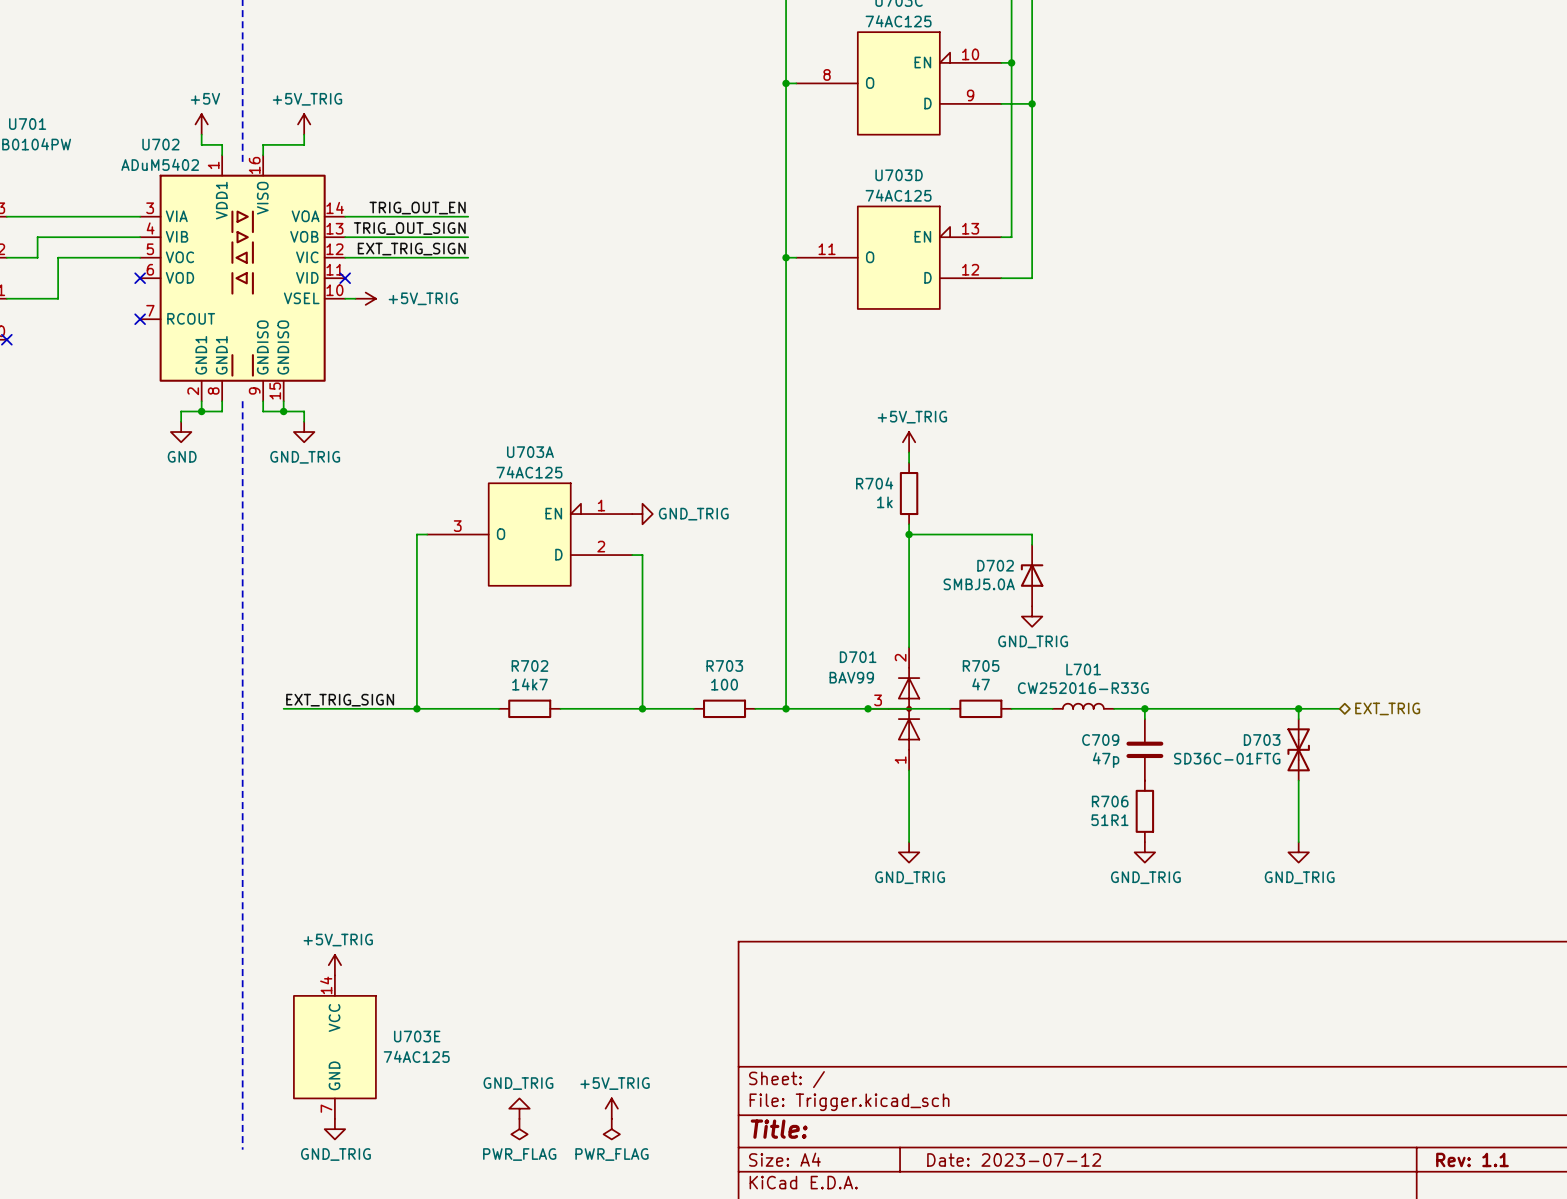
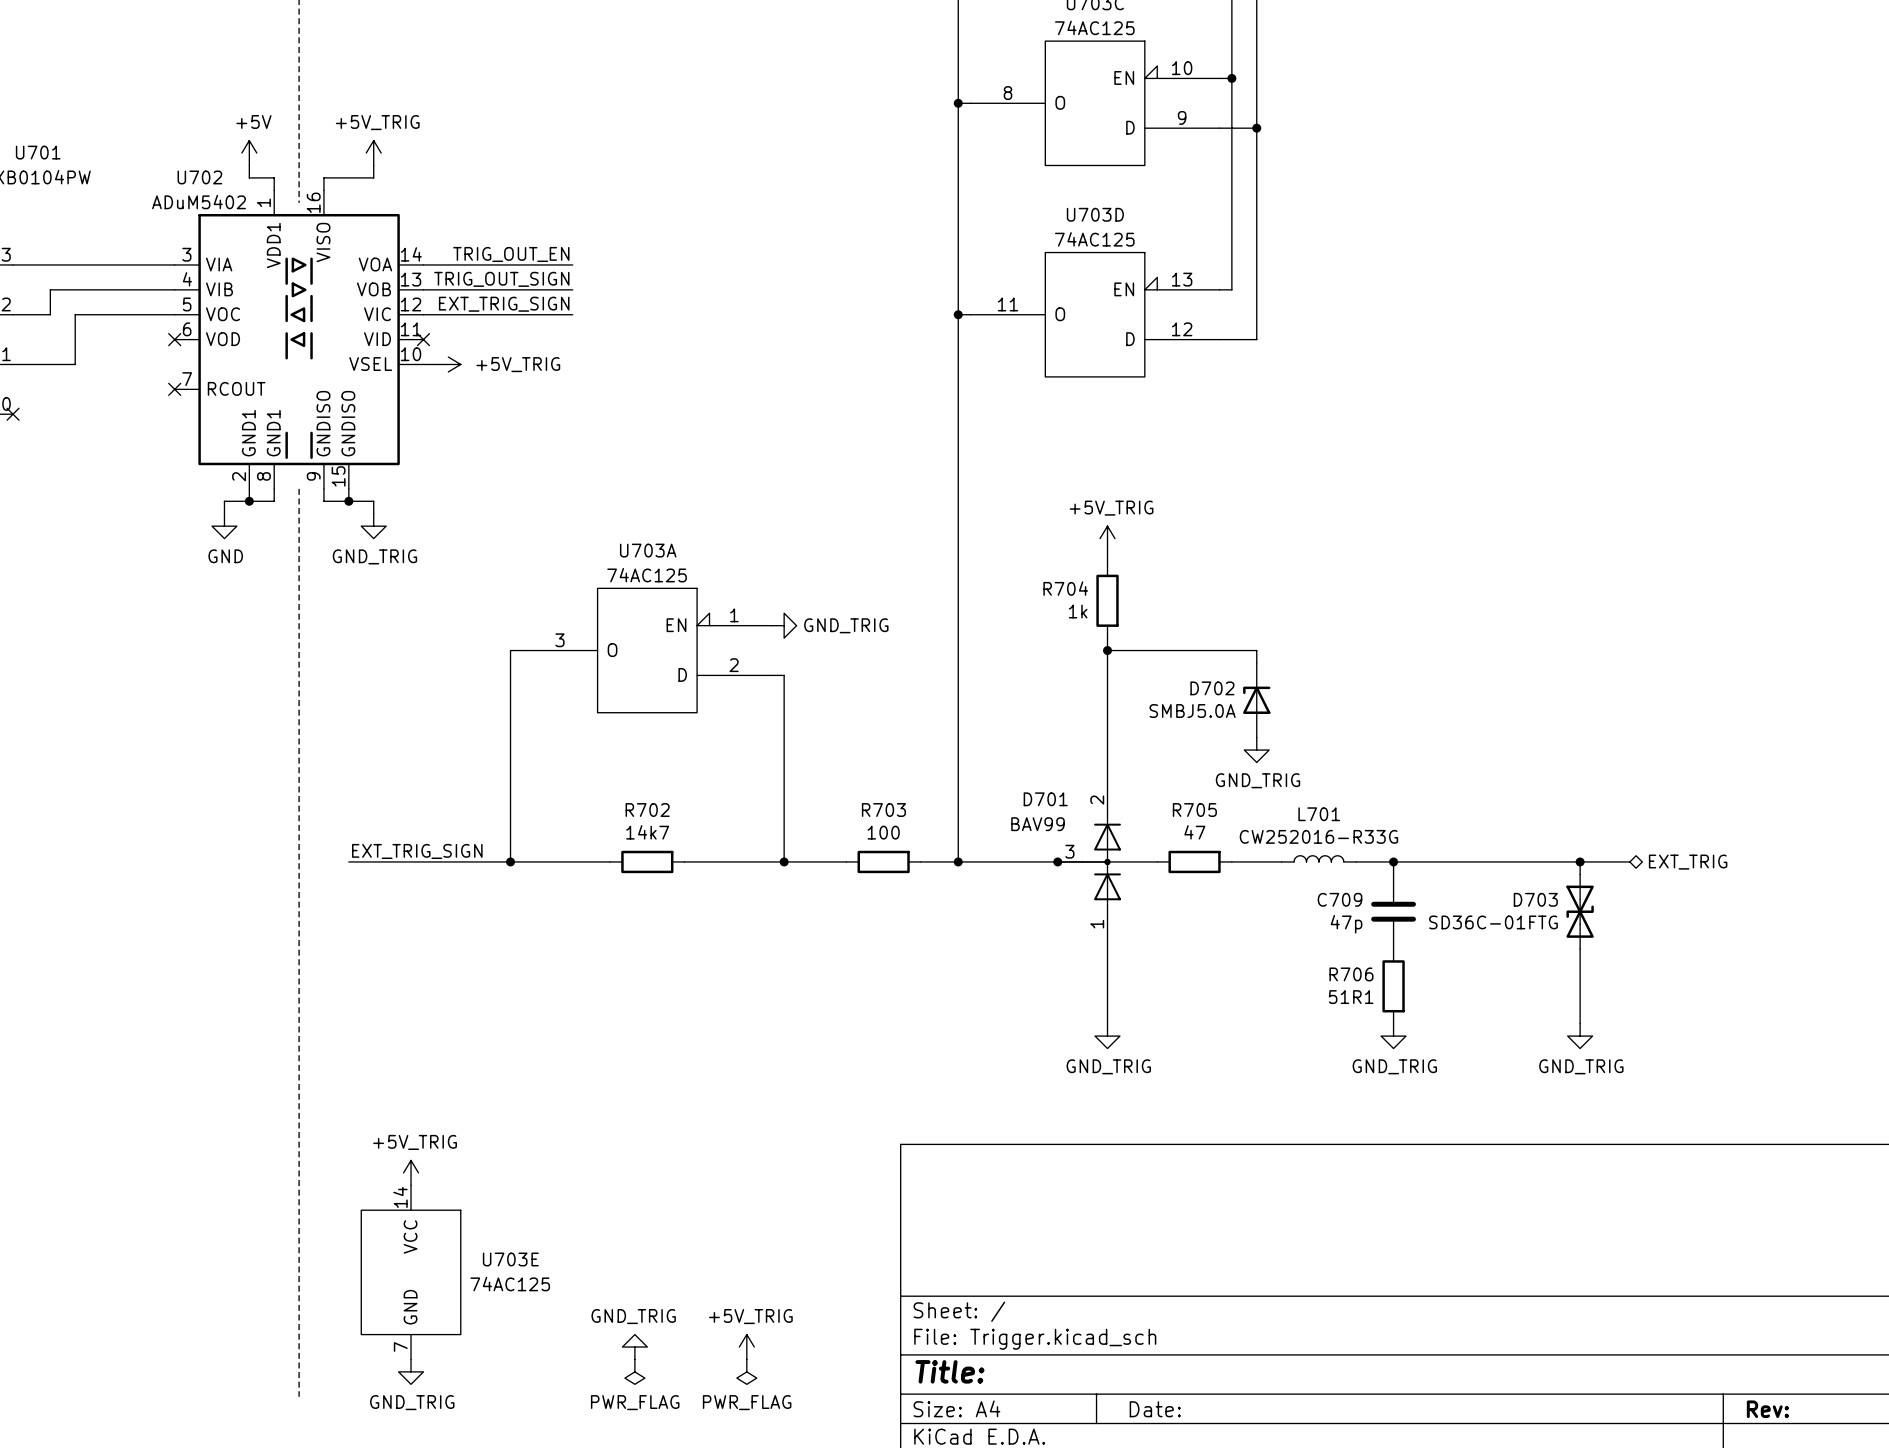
title block: Date: 2023-07-12 (1014, 1159) -> Date: (1155, 1409)
title block: Rev: 1.1 (1472, 1159) -> Rev: (1767, 1409)

